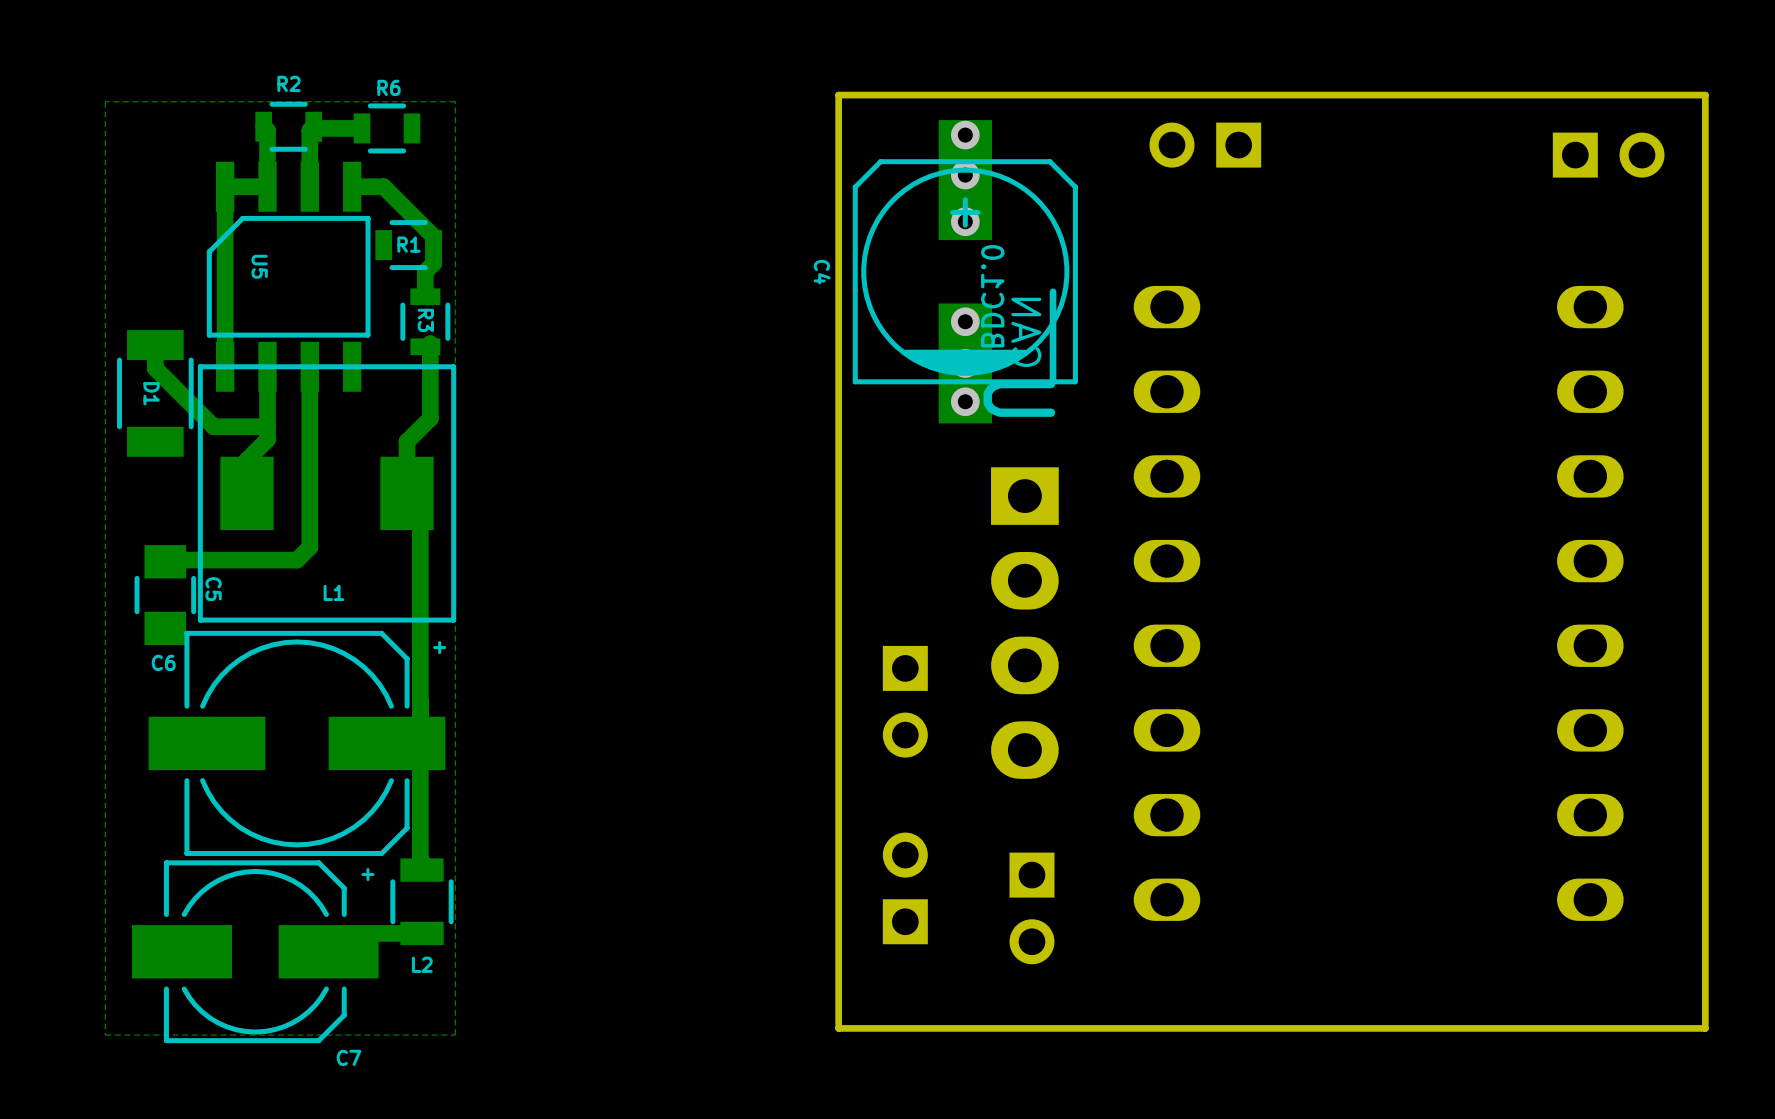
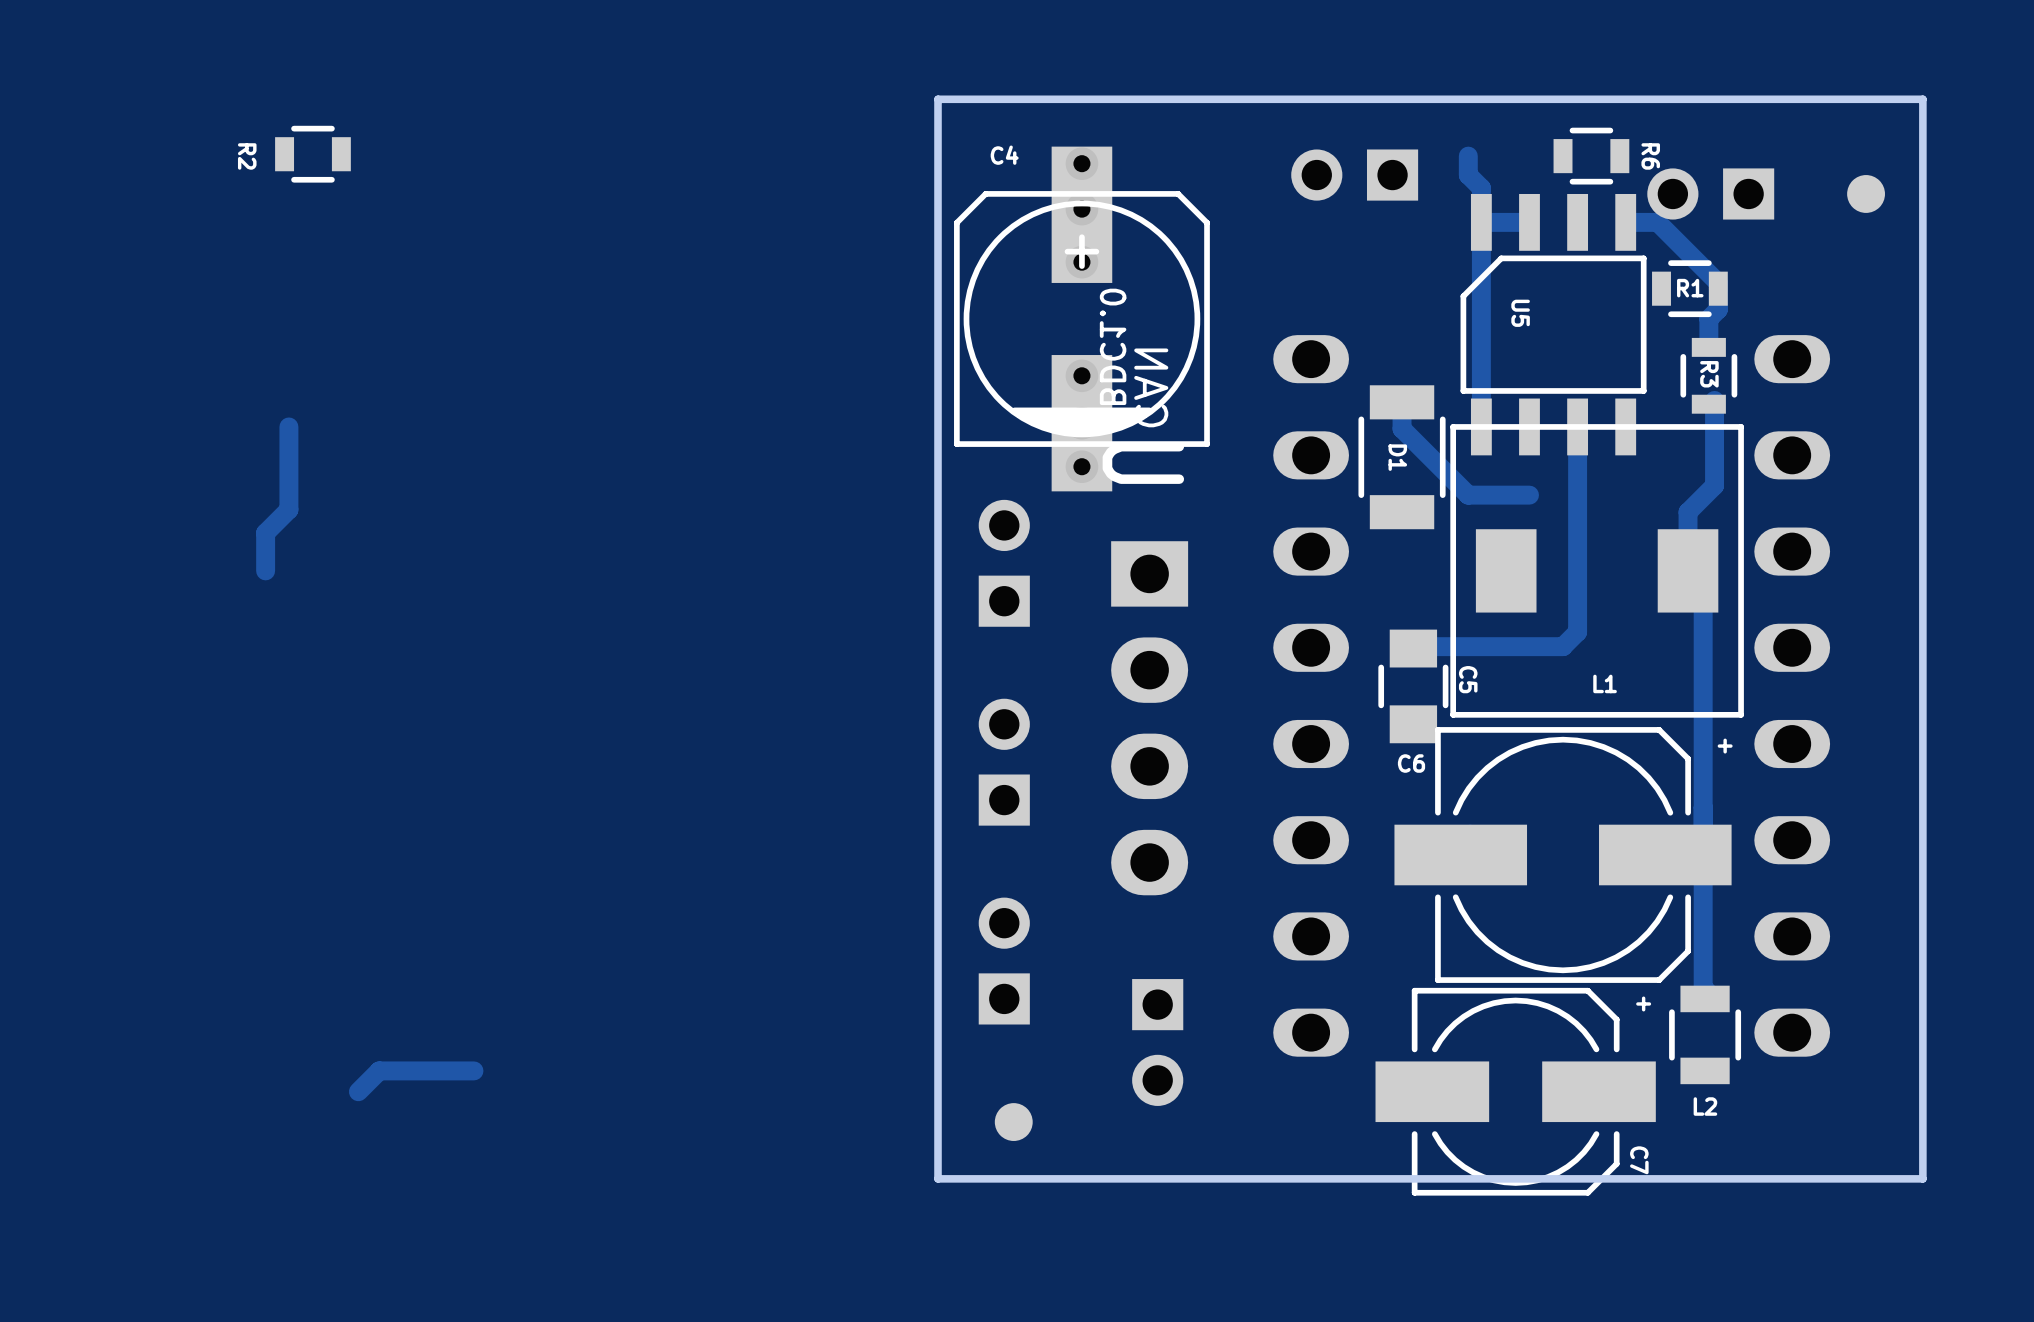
R2 name rotation: 0° (288, 83) -> 90° clockwise (247, 156)
R2 name position: R2 (288, 83) -> R2 (247, 156)
R6 name rotation: 0° (388, 87) -> 90° clockwise (1650, 156)
R6 name position: R6 (388, 87) -> R6 (1650, 156)
board edge: (1705, 95) (838, 95) -> (1922, 118) (1922, 99) (938, 99) (938, 118)
zone outline: (455, 101) (455, 1035) (105, 1035) (105, 101) (455, 101) -> none
track: (263, 126) (267, 130) (267, 186) (225, 186) (225, 366) -> none
track: (362, 128) (315, 128) (313, 126) (309, 130) (309, 186) -> none
R6 position: (387, 128) -> (1591, 156)
track: none -> (1468, 156) (1468, 175) (1481, 188) (1481, 426)
part rotation: 0° (1608, 155) -> 180° (1710, 193)
part position: (1608, 155) -> (1710, 193)
part: none -> (1866, 193)
track: (352, 186) (383, 186) (433, 236) (433, 263) (425, 271) (425, 296) -> none
track: none -> (1529, 222) (1481, 222)
track: none -> (1625, 222) (1657, 222) (1718, 283) (1718, 309) (1708, 318) (1708, 347)
R1 position: (408, 245) -> (1689, 288)
C4 name rotation: 0° (822, 272) -> 90° counterclockwise (1004, 155)
C4 name position: C4 (822, 272) -> C4 (1004, 155)
U5 position: (288, 276) -> (1553, 324)
line: (1053, 291) (1053, 379) -> none
R3 position: (425, 321) -> (1708, 375)
track: (430, 343) (430, 418) (407, 441) (407, 493) (420, 506) (420, 860) (430, 870) -> none
track: none -> (1714, 400) (1714, 485) (1688, 512) (1688, 570) (1703, 586) (1703, 987) (1714, 998)
track: (155, 345) (155, 368) (213, 426) (267, 426) -> none
track: none -> (1402, 402) (1402, 428) (1468, 495) (1529, 495)
track: (309, 366) (309, 547) (297, 560) (155, 560) -> none
track: none -> (1577, 426) (1577, 632) (1563, 646) (1402, 646)
D1 position: (155, 393) -> (1402, 457)
part: none -> (1004, 563)
L1 position: (327, 493) -> (1597, 570)
C5 position: (165, 595) -> (1413, 686)
part rotation: 0° (905, 701) -> 180° (1004, 762)
C6 position: (297, 743) -> (1563, 854)
part position: (905, 888) -> (1004, 961)
L2 position: (422, 901) -> (1705, 1034)
C7 position: (255, 951) -> (1515, 1091)
part: none -> (1013, 1122)
C7 name rotation: 0° (348, 1057) -> 90° clockwise (1639, 1160)
C7 name position: C7 (348, 1057) -> C7 (1639, 1160)

